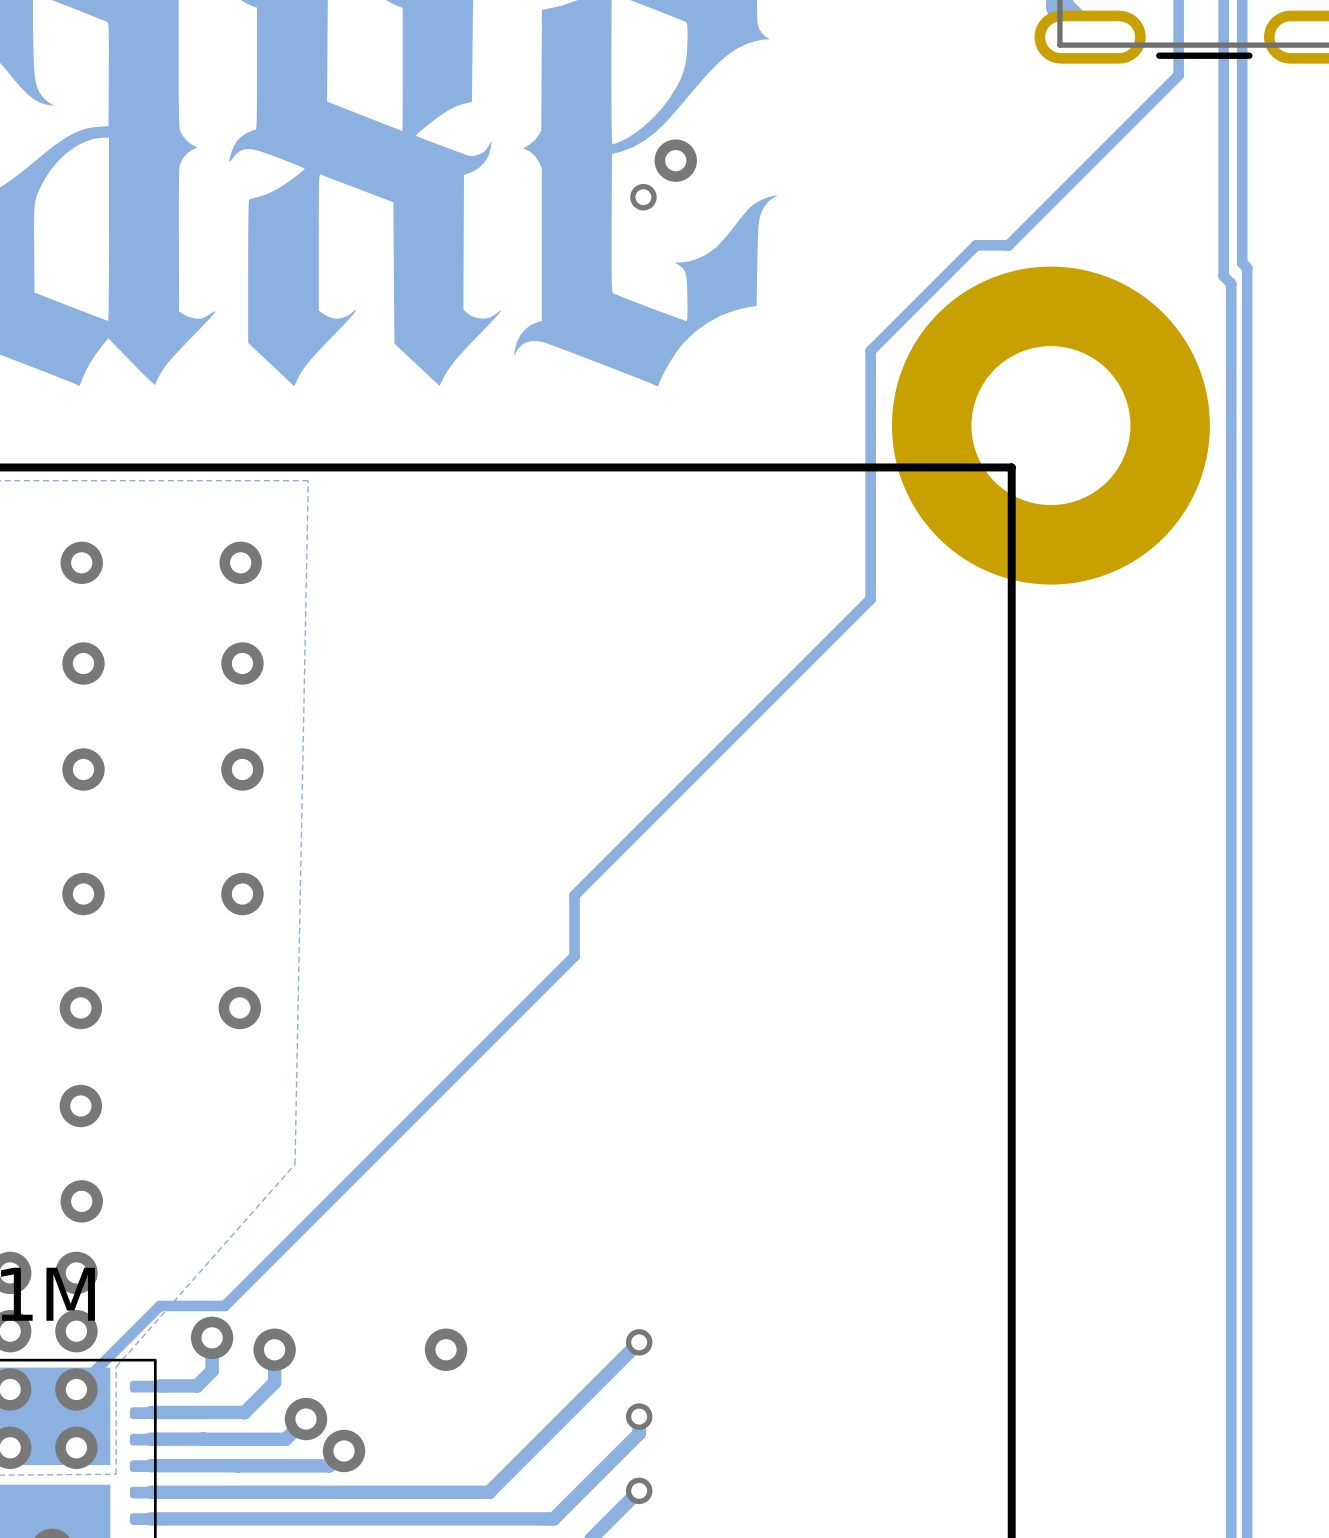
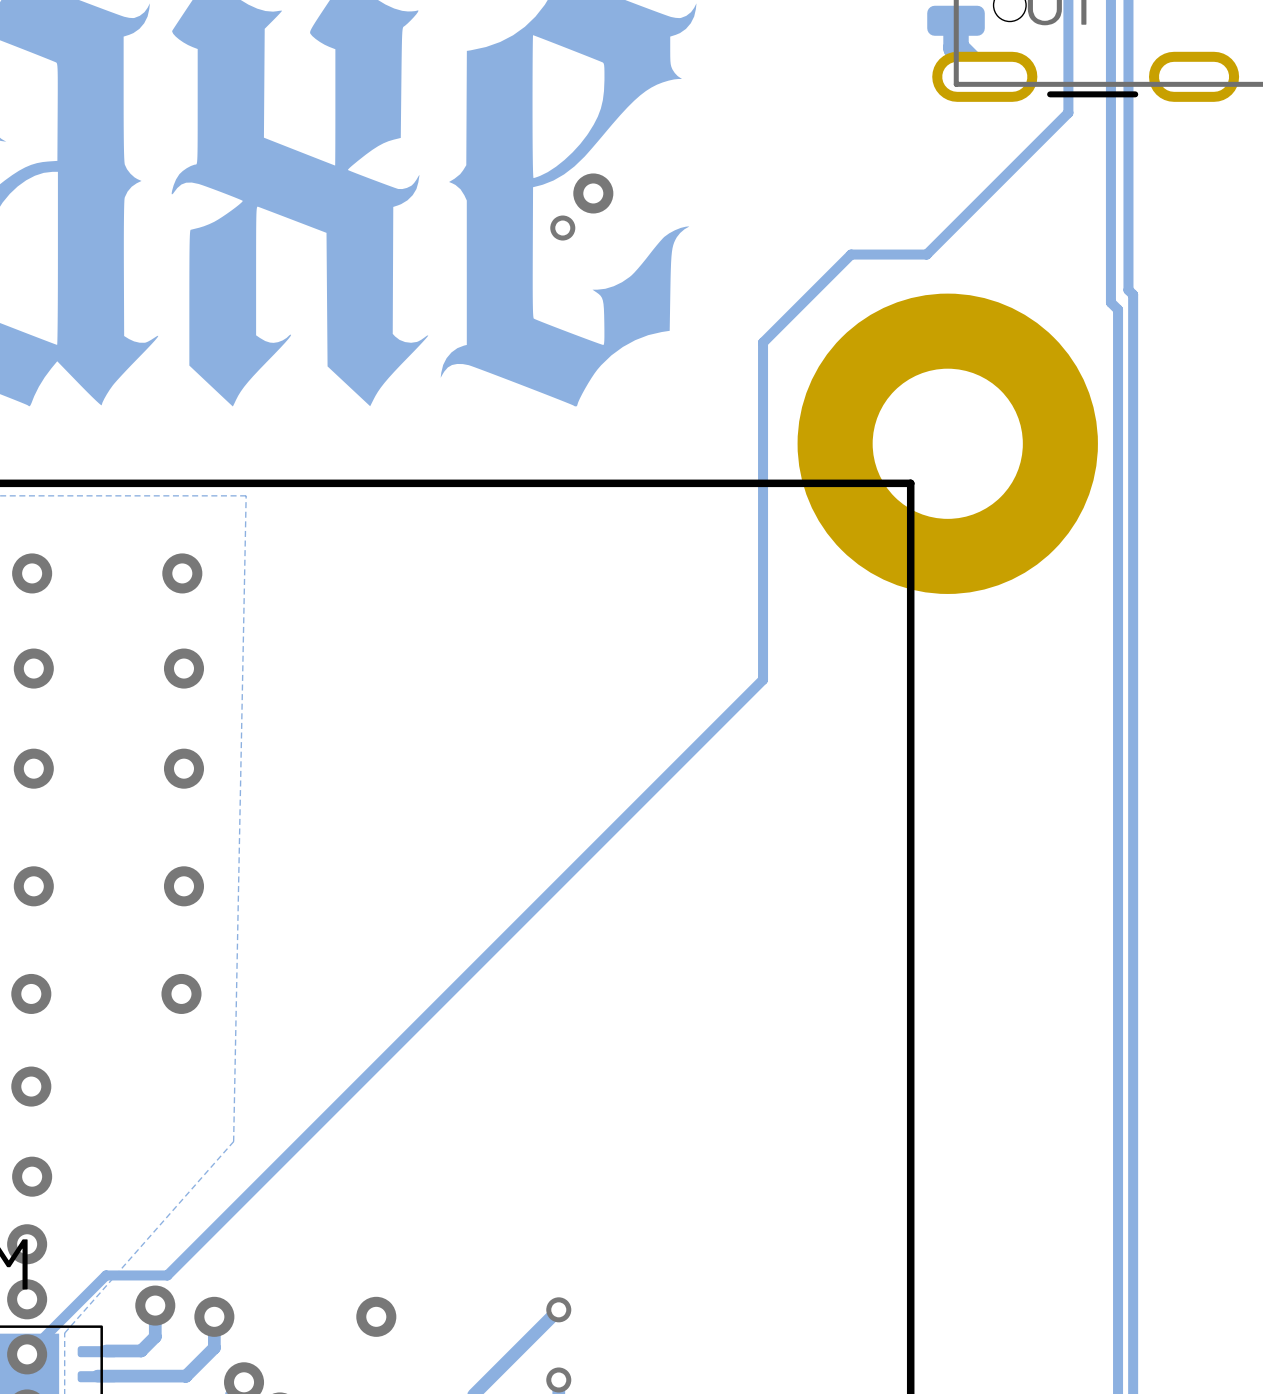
track: (1028, 225) (1008, 245) (976, 245) (870, 350) (870, 599) (574, 895) (574, 956) -> (926, 254) (851, 254) (763, 342) (763, 679) (497, 945)

